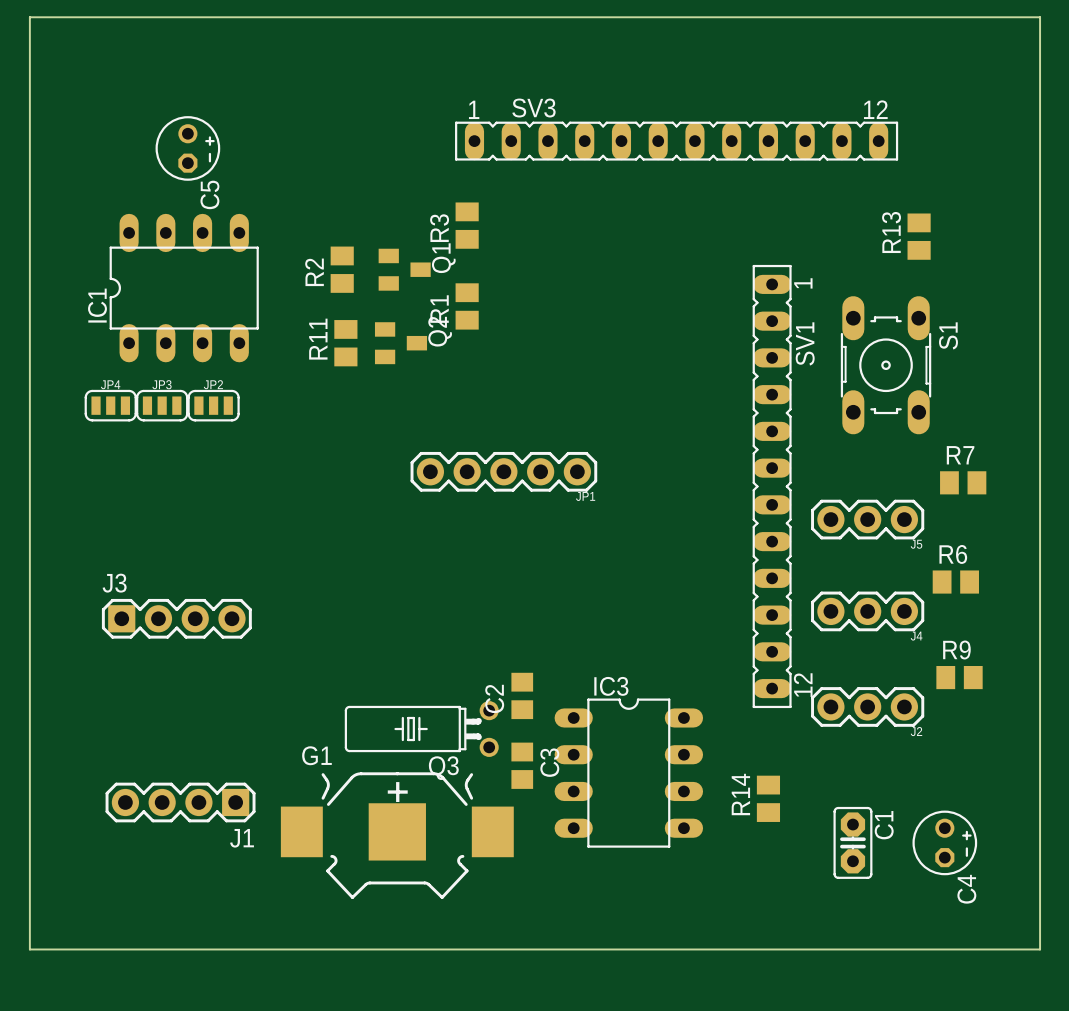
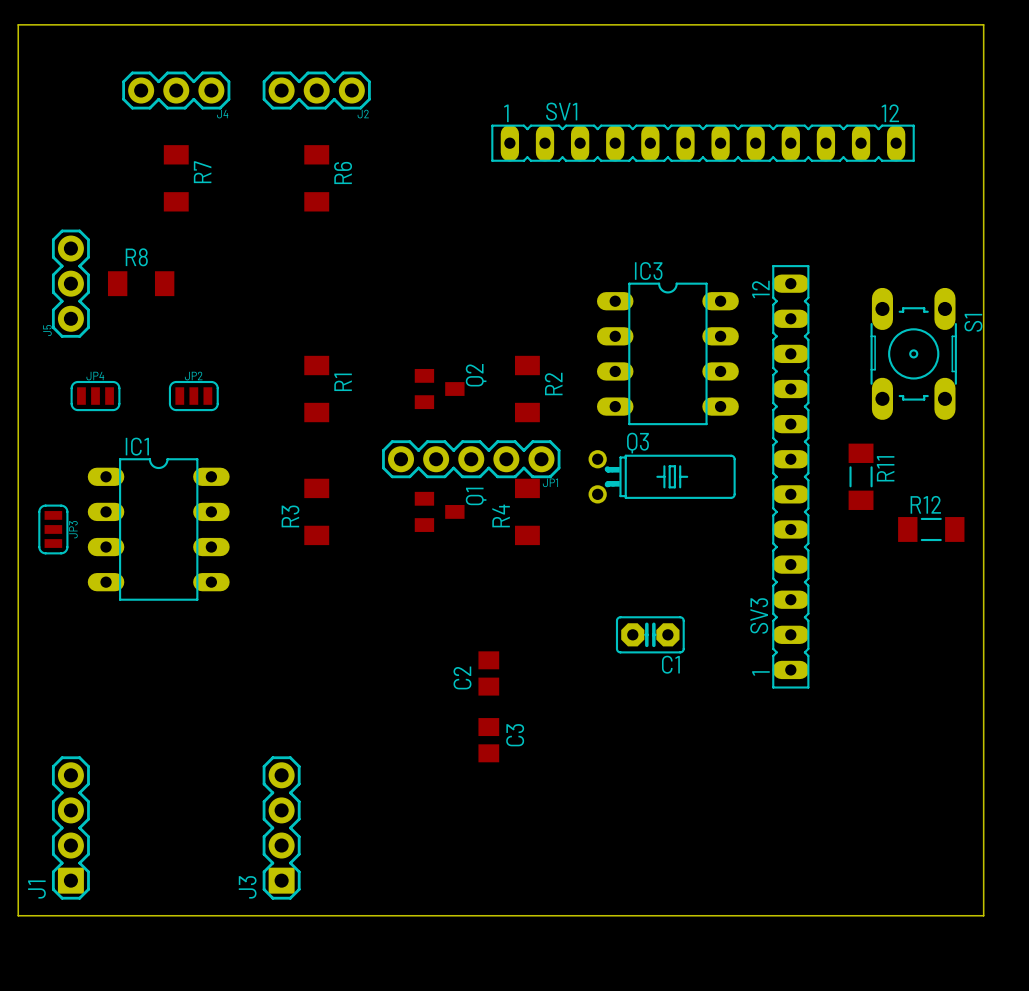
SV3 rotation: 0° (676, 141) -> 90° counterclockwise (790, 476)
SV3 position: (676, 141) -> (790, 476)
C5: (187, 148) -> none
R3 footprint: [455, 202, 479, 249] -> [304, 478, 330, 546]
R13: (919, 236) -> none
R2 footprint: [330, 246, 354, 293] -> [514, 355, 540, 423]
SV1 footprint: [752, 264, 792, 709] -> [491, 124, 915, 162]
Q1 position: (404, 269) -> (439, 511)
R2 name position: R2 (314, 272) -> R2 (553, 384)
R1 footprint: [455, 283, 479, 330] -> [304, 355, 330, 423]
R8: none -> (141, 283)
IC1 rotation: 0° (184, 288) -> 90° clockwise (158, 529)
IC1 position: (184, 288) -> (158, 529)
R1 name position: R1 (439, 309) -> R1 (343, 382)
R11 footprint: [334, 320, 358, 367] -> [848, 443, 874, 510]
R11 name position: R11 (318, 339) -> R11 (885, 468)
Q2 position: (401, 343) -> (439, 389)
SV1 name position: SV1 (805, 343) -> SV1 (561, 111)
S1 position: (886, 365) -> (913, 353)
JP3 rotation: 0° (162, 405) -> 90° clockwise (53, 529)
JP3 position: (162, 405) -> (53, 529)
R7 name position: R7 (960, 455) -> R7 (202, 172)
R7 footprint: [940, 471, 987, 495] -> [163, 145, 189, 212]
J5 rotation: 0° (867, 519) -> 90° clockwise (70, 283)
J5 position: (867, 519) -> (70, 283)
R4: none -> (527, 511)
R12: none -> (931, 529)
R6 name position: R6 (953, 554) -> R6 (343, 172)
R6 footprint: [932, 570, 979, 594] -> [304, 145, 330, 212]
J4 position: (867, 611) -> (176, 90)
J3 rotation: 0° (176, 618) -> 90° counterclockwise (281, 827)
J3 position: (176, 618) -> (281, 827)
R9: (959, 677) -> none
J2 position: (867, 706) -> (316, 90)
Q3 rotation: 0° (421, 729) -> 180° (662, 476)
Q3 position: (421, 729) -> (662, 476)
IC3 position: (628, 773) -> (667, 353)
R14: (768, 798) -> none
J1 rotation: 0° (180, 802) -> 90° clockwise (70, 827)
J1 position: (180, 802) -> (70, 827)
G1: (397, 835) -> none
C1 rotation: 0° (852, 842) -> 90° clockwise (650, 634)
C1 position: (852, 842) -> (650, 634)
C4: (944, 842) -> none

